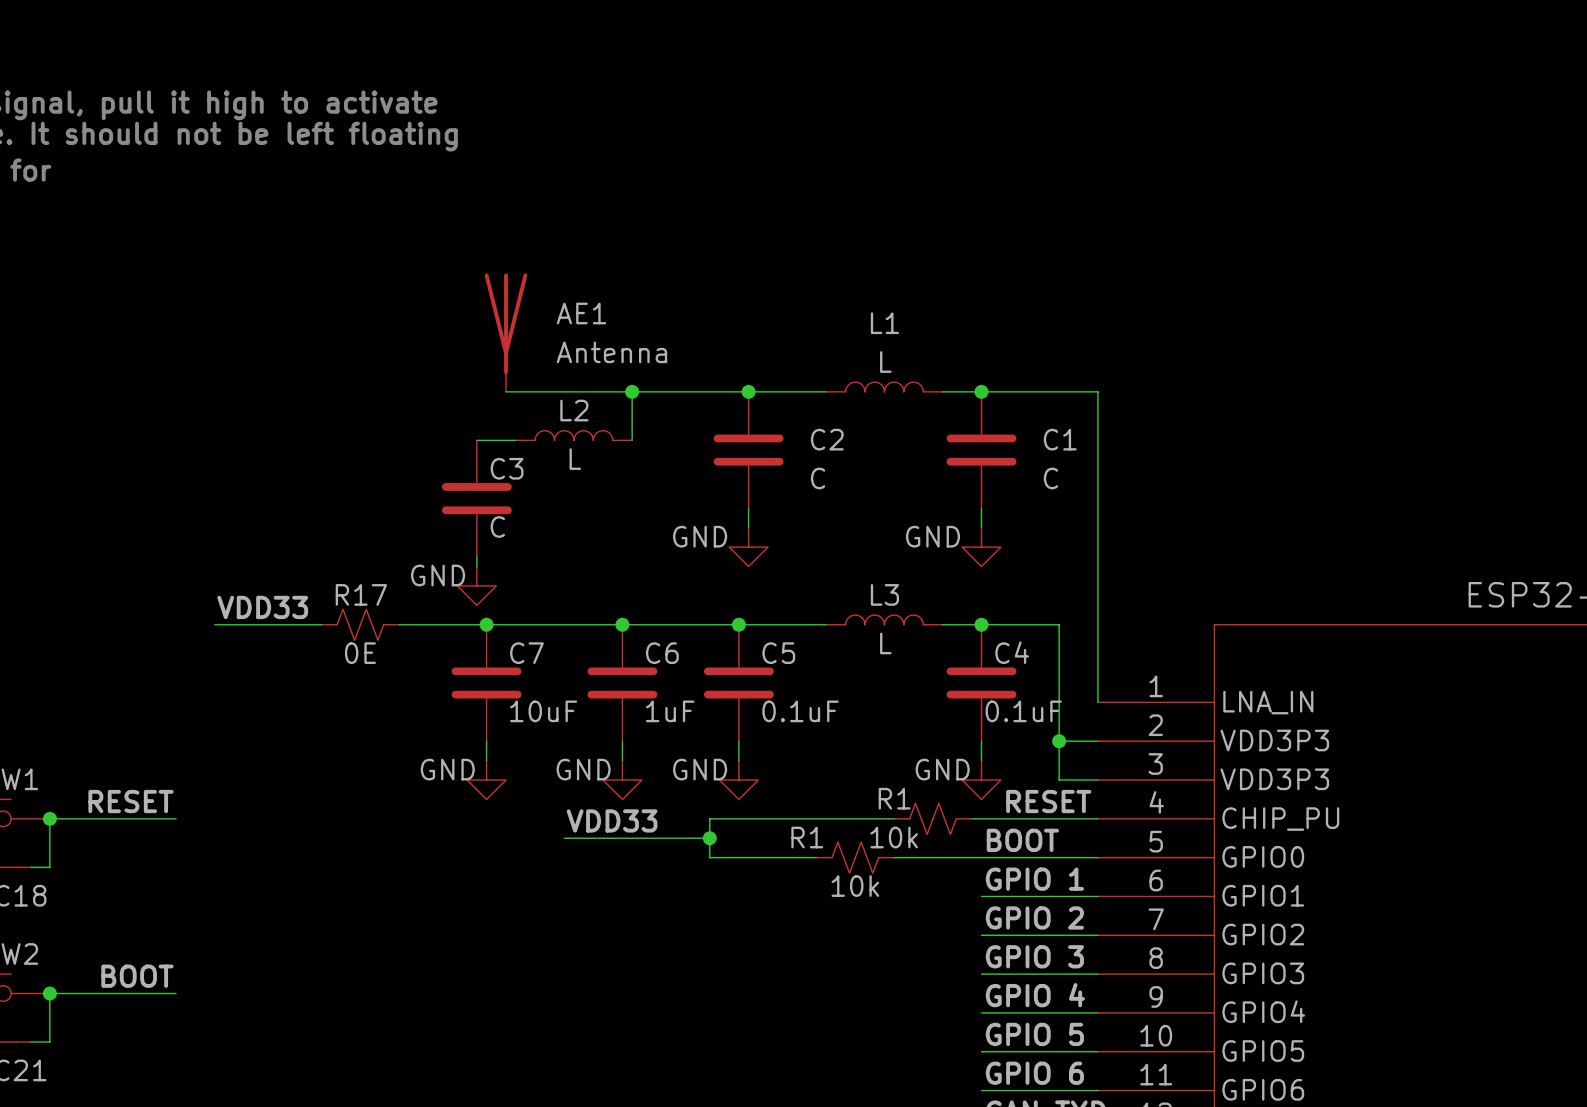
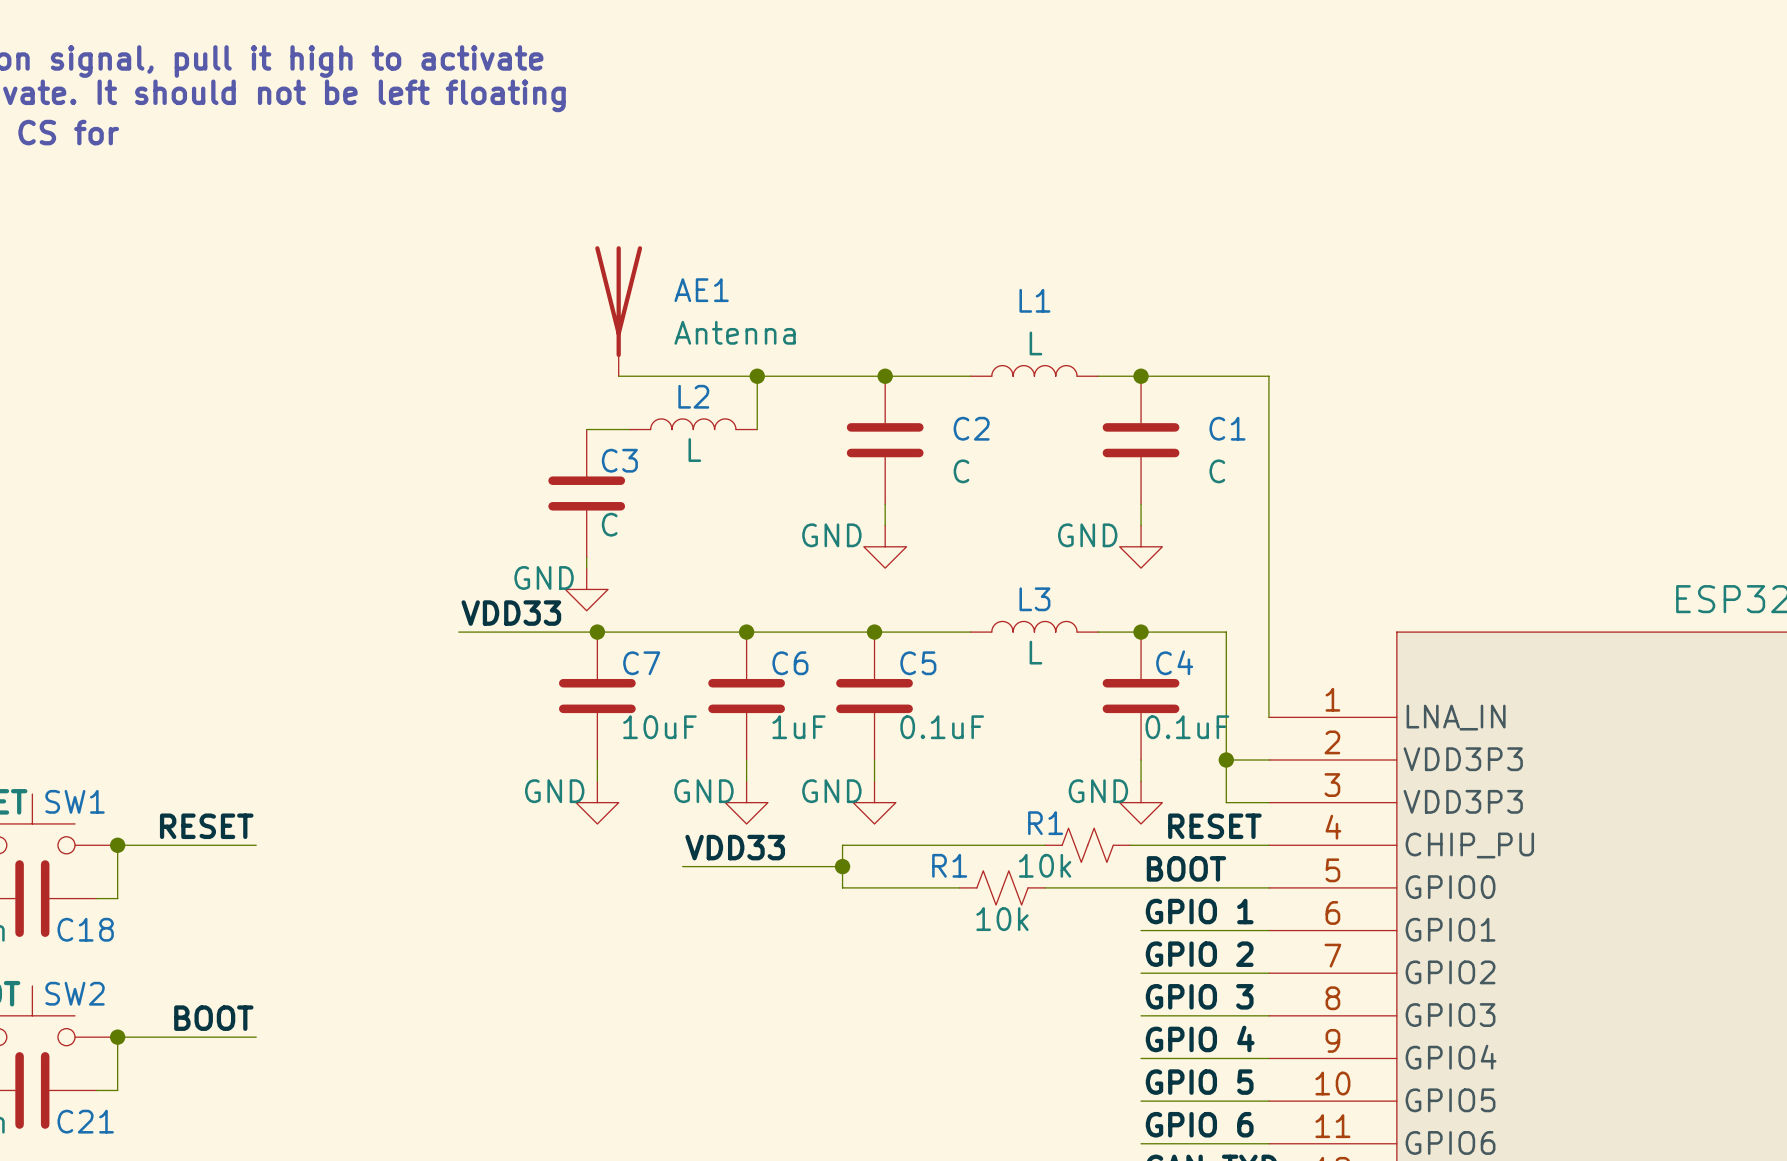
label position: VDD33 (262, 607) -> VDD33 (511, 613)
wire: (214, 624) (321, 624) -> none
wire: none -> (458, 632) (501, 632)
R17: 0E (360, 624) -> none

